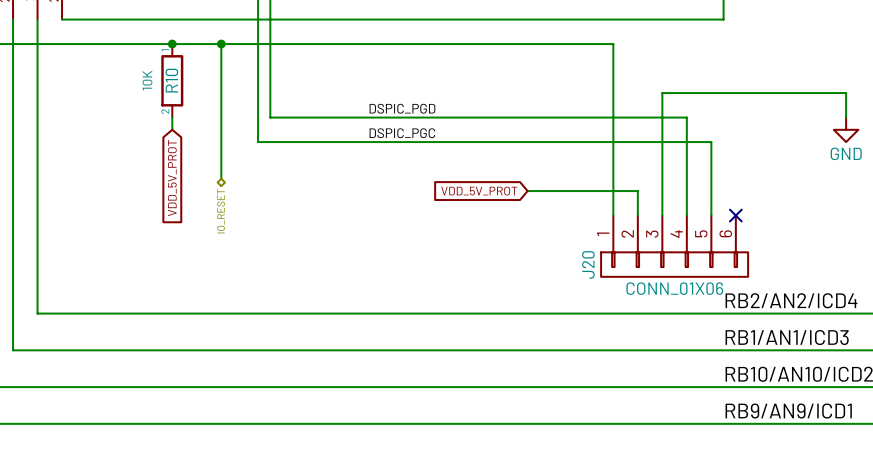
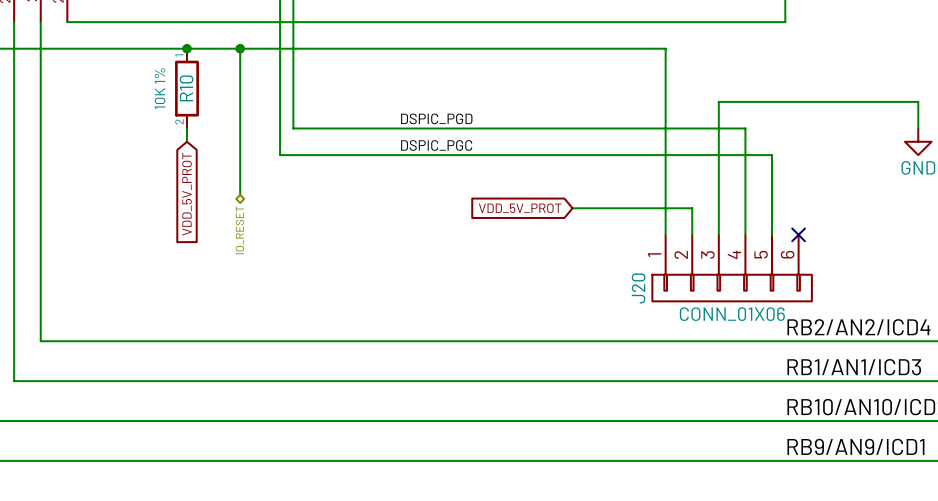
R10 value: 10K (147, 80) -> 10K 1% (160, 88)

